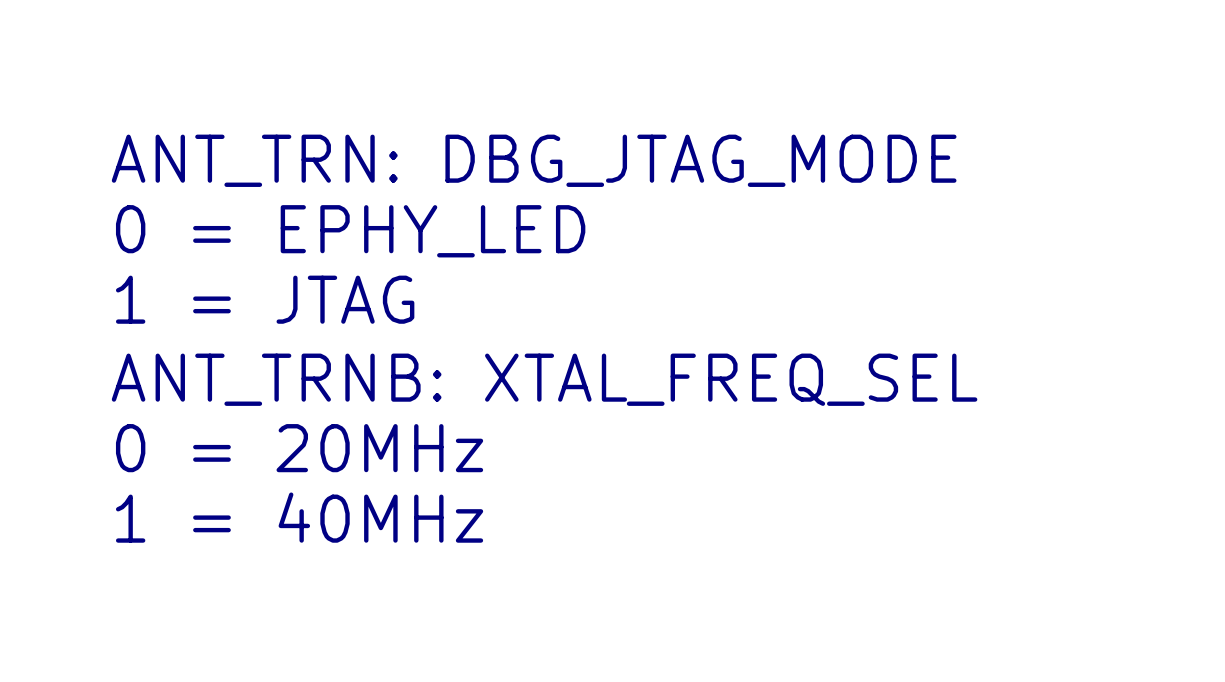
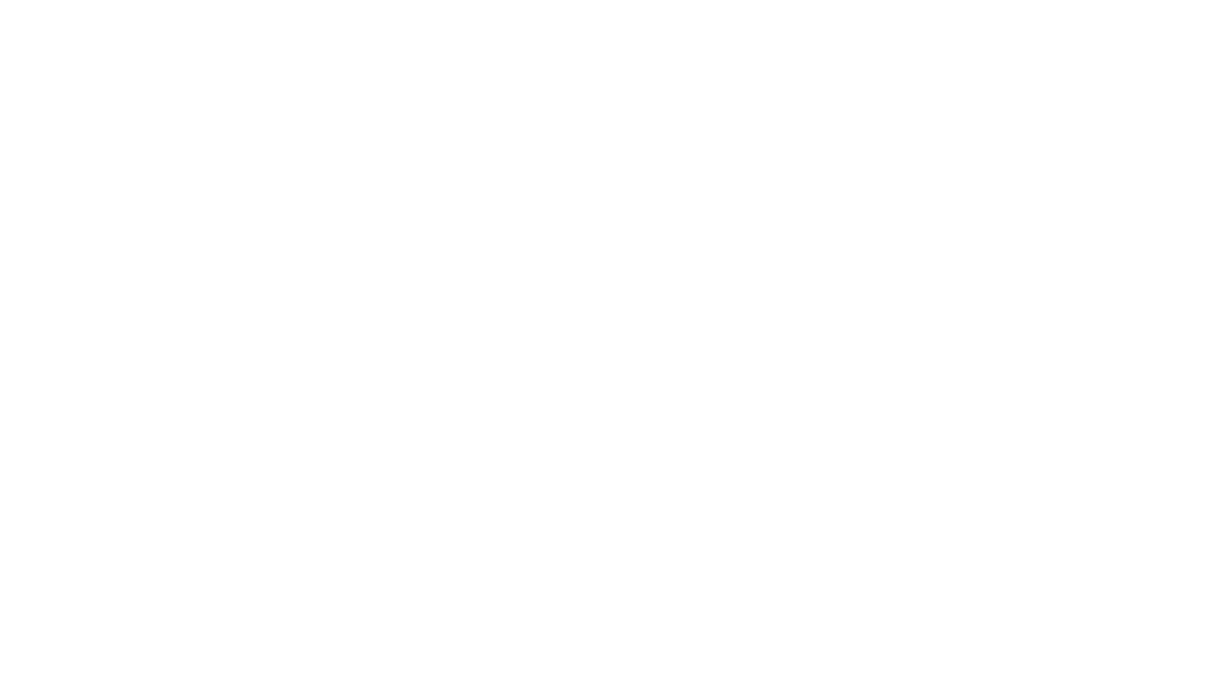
text: ANT_TRN: DBG_JTAG_MODE (534, 160) -> none
text: 0 = EPHY_LED (350, 231) -> none
text: 1 = JTAG (265, 299) -> none
text: ANT_TRNB: XTAL_FREQ_SEL (544, 379) -> none
text: 0 = 20MHz (299, 448) -> none
text: 1 = 40MHz (299, 517) -> none

